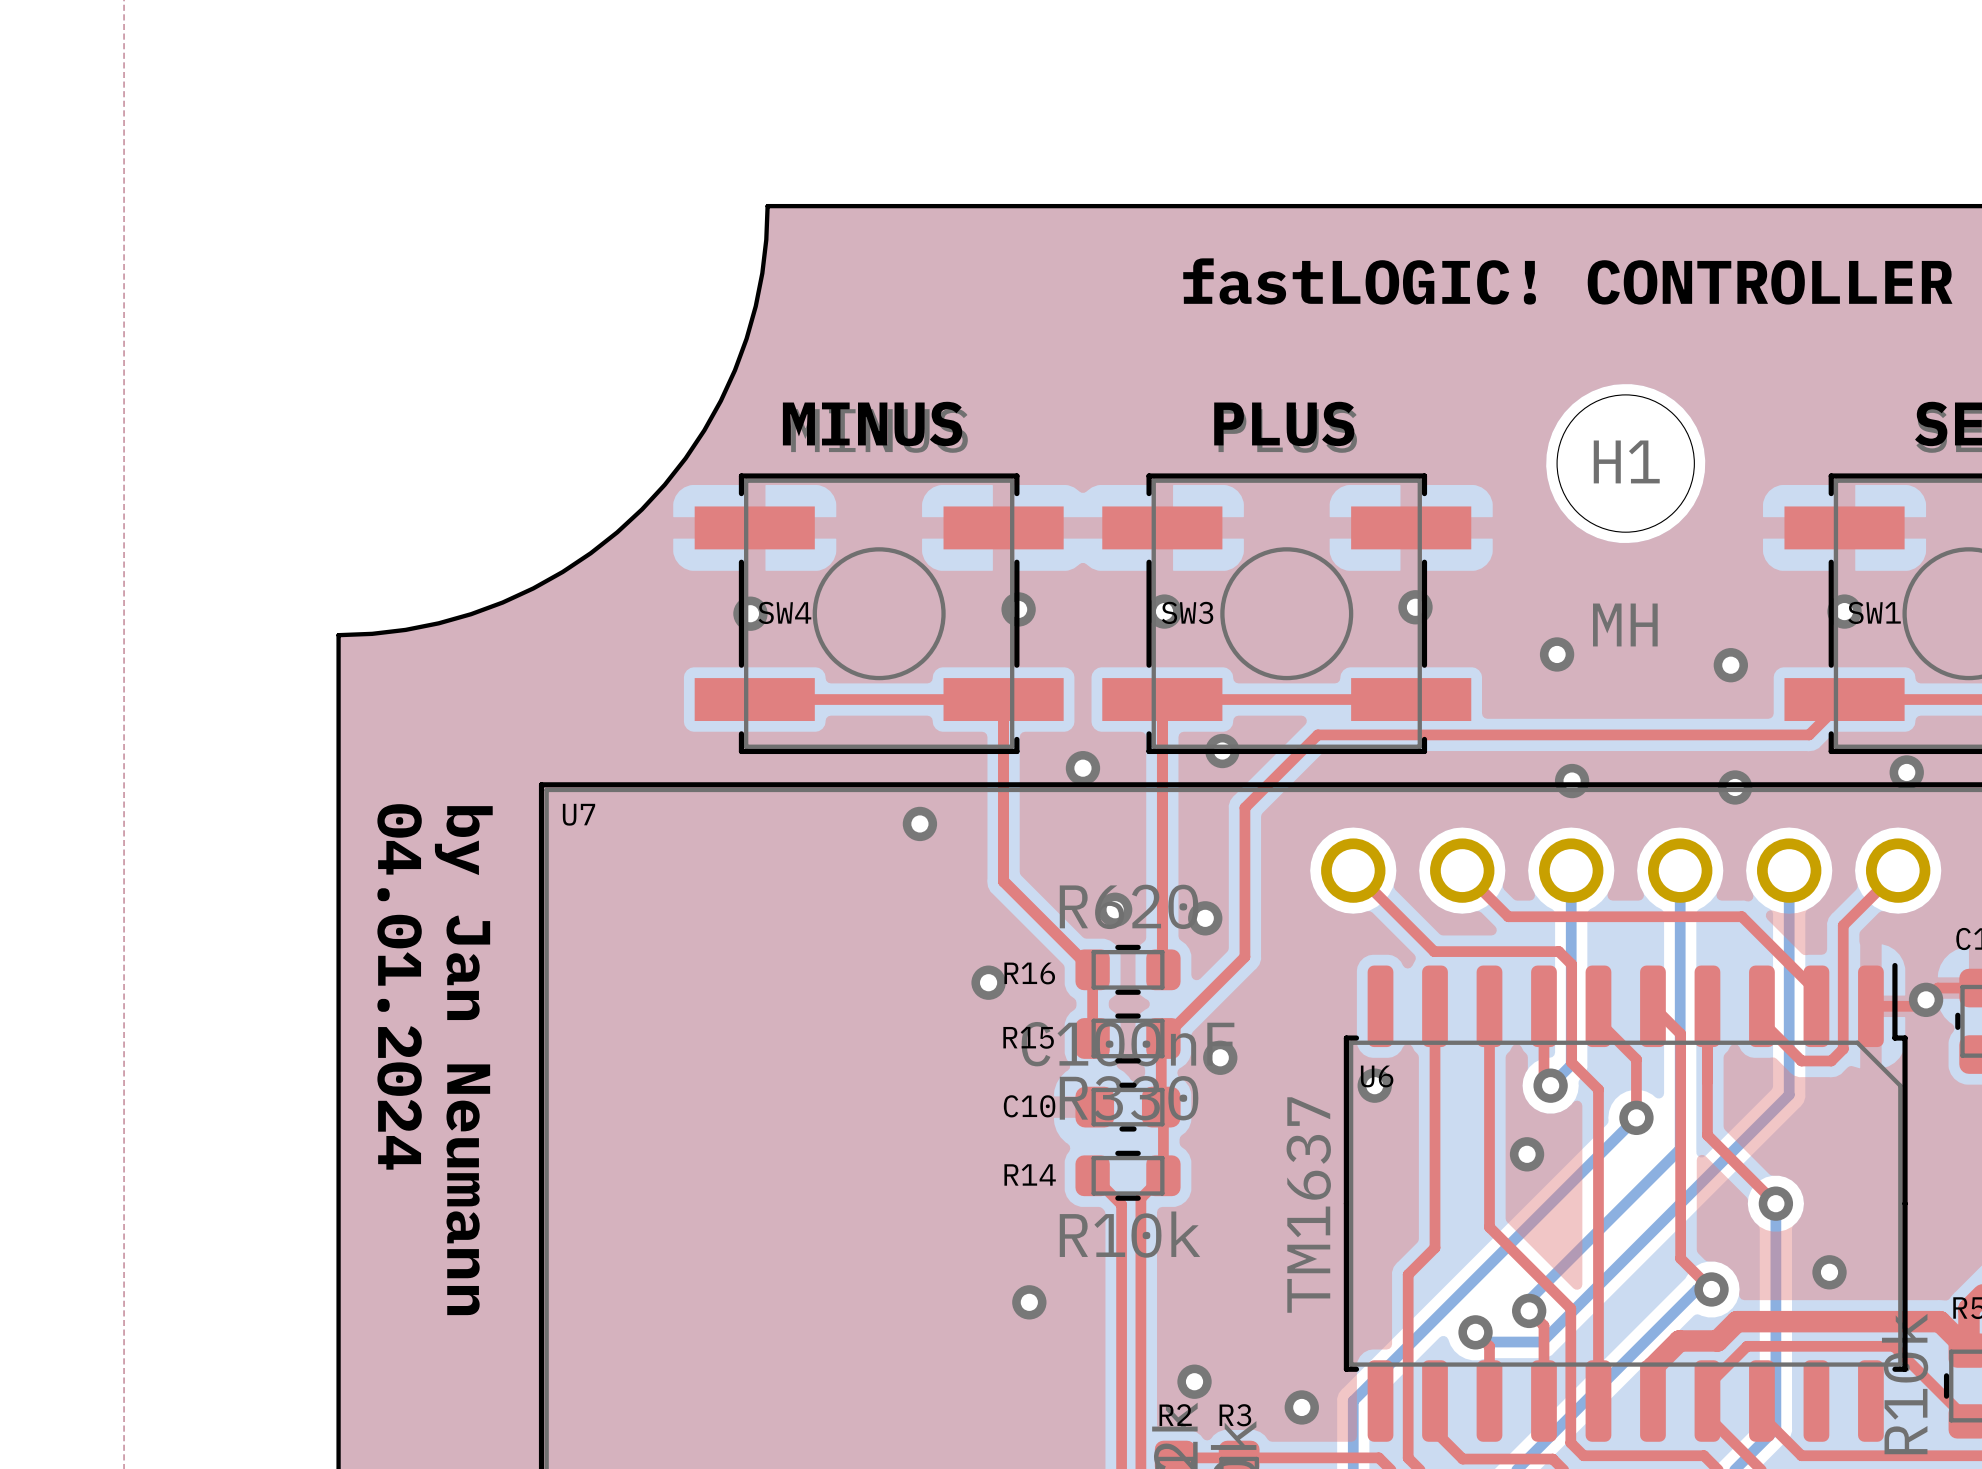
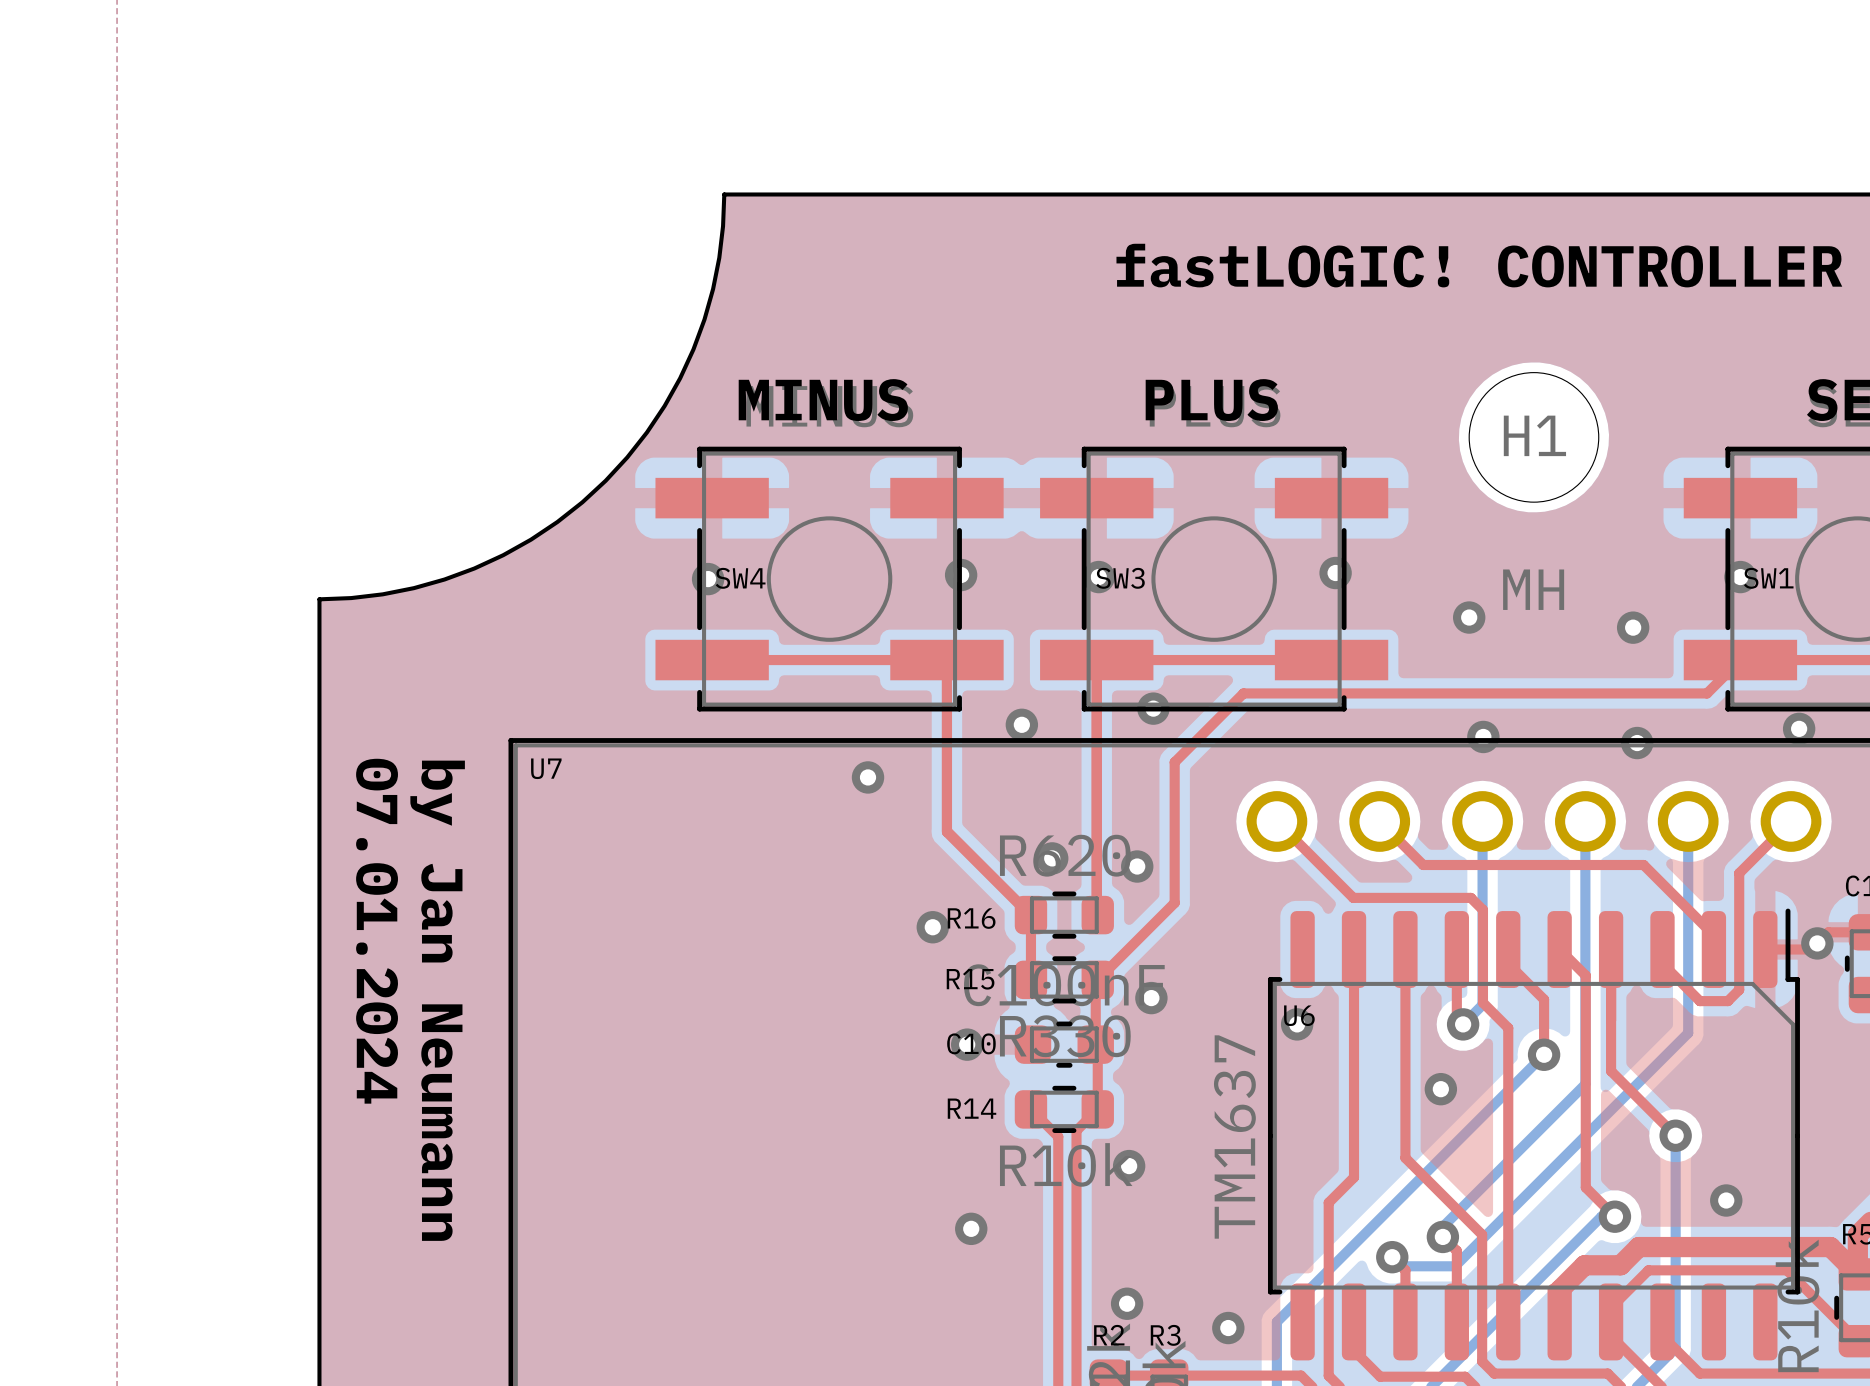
text: 04.01.2024 (399, 986) -> 07.01.2024 (377, 931)
via: none -> (967, 1044)
via: none -> (1129, 1166)

